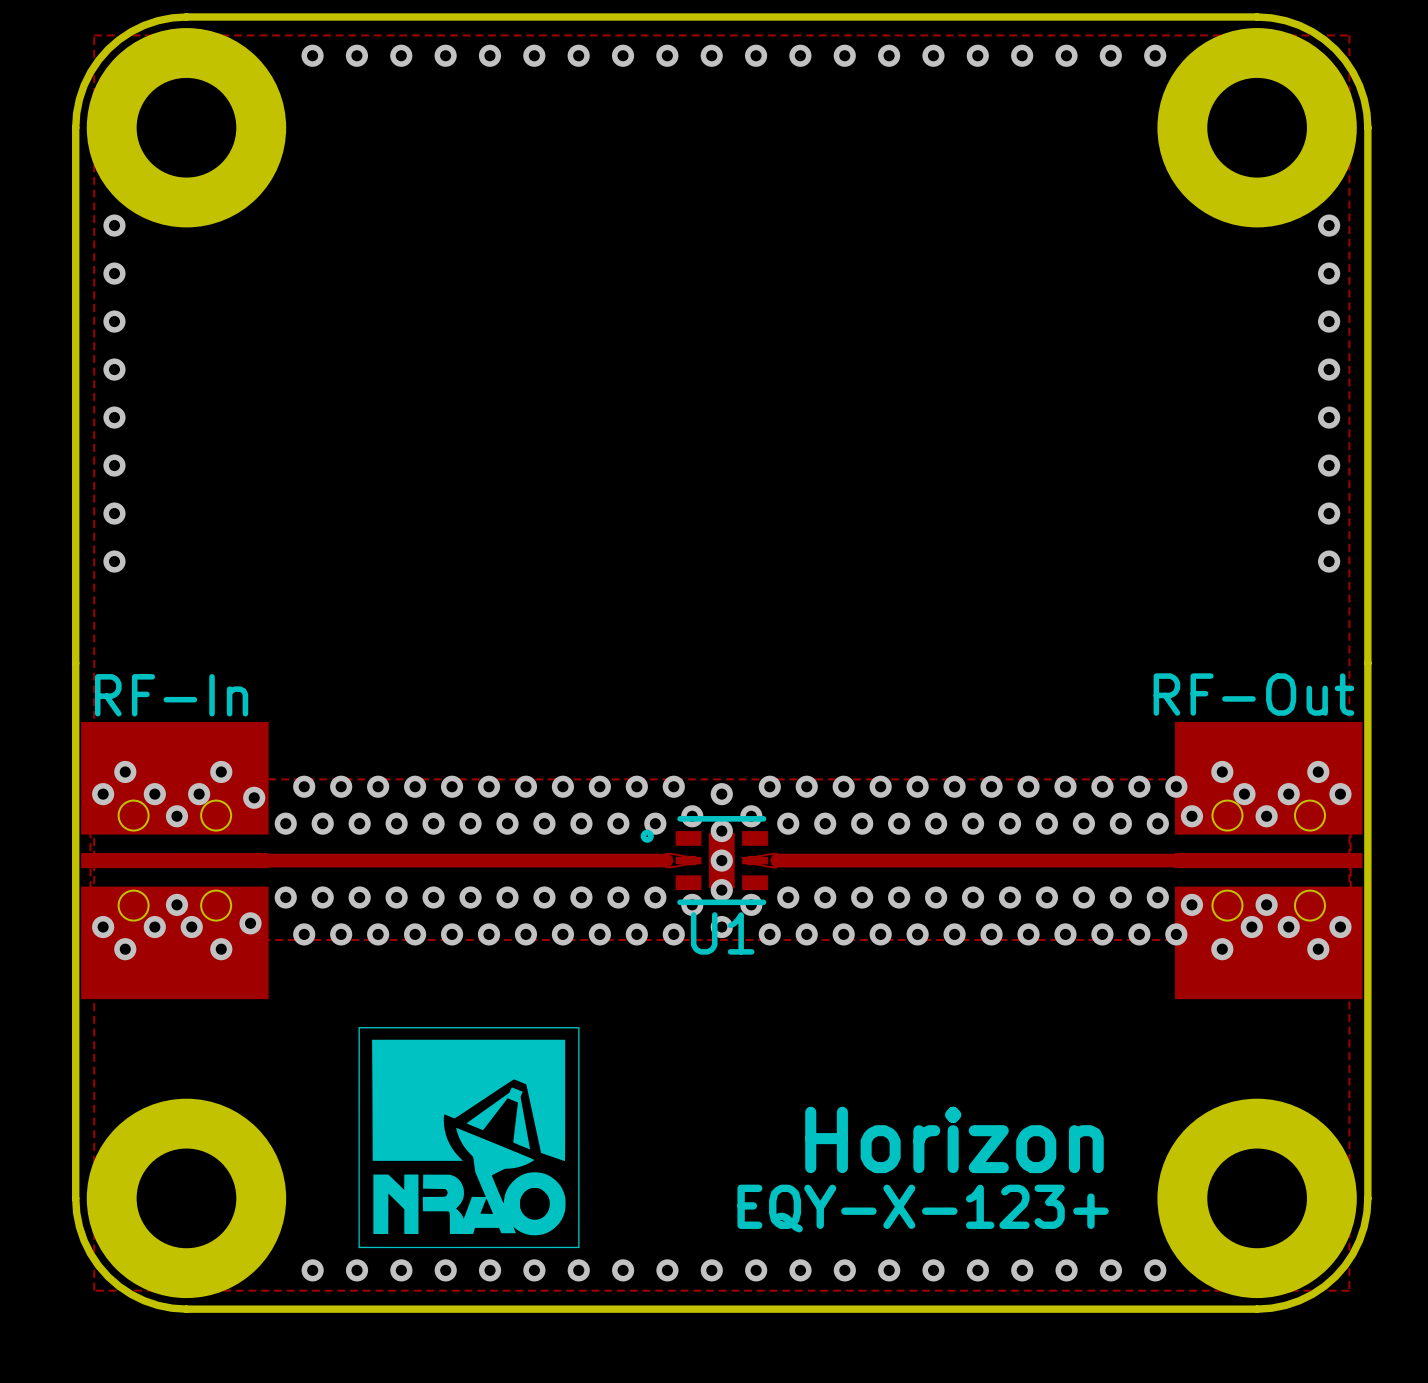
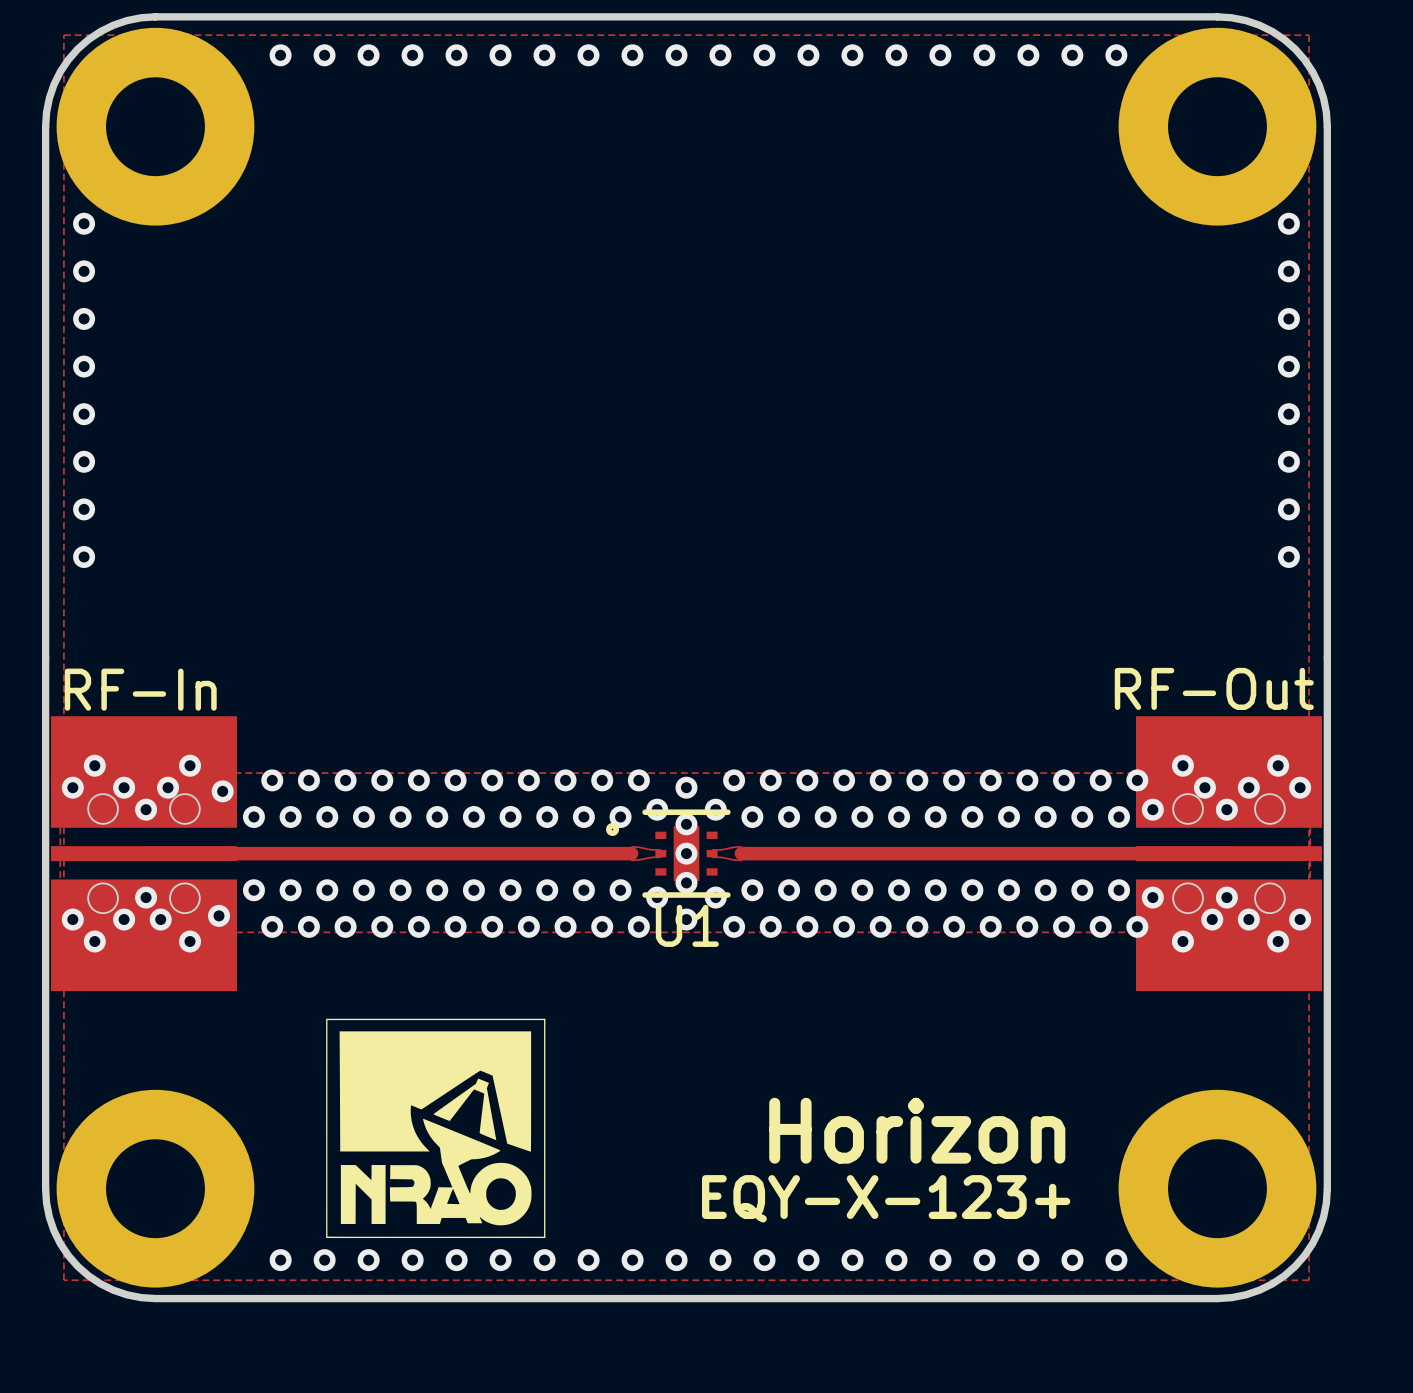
U1 footprint: [640, 816, 768, 906] -> [606, 809, 731, 898]

